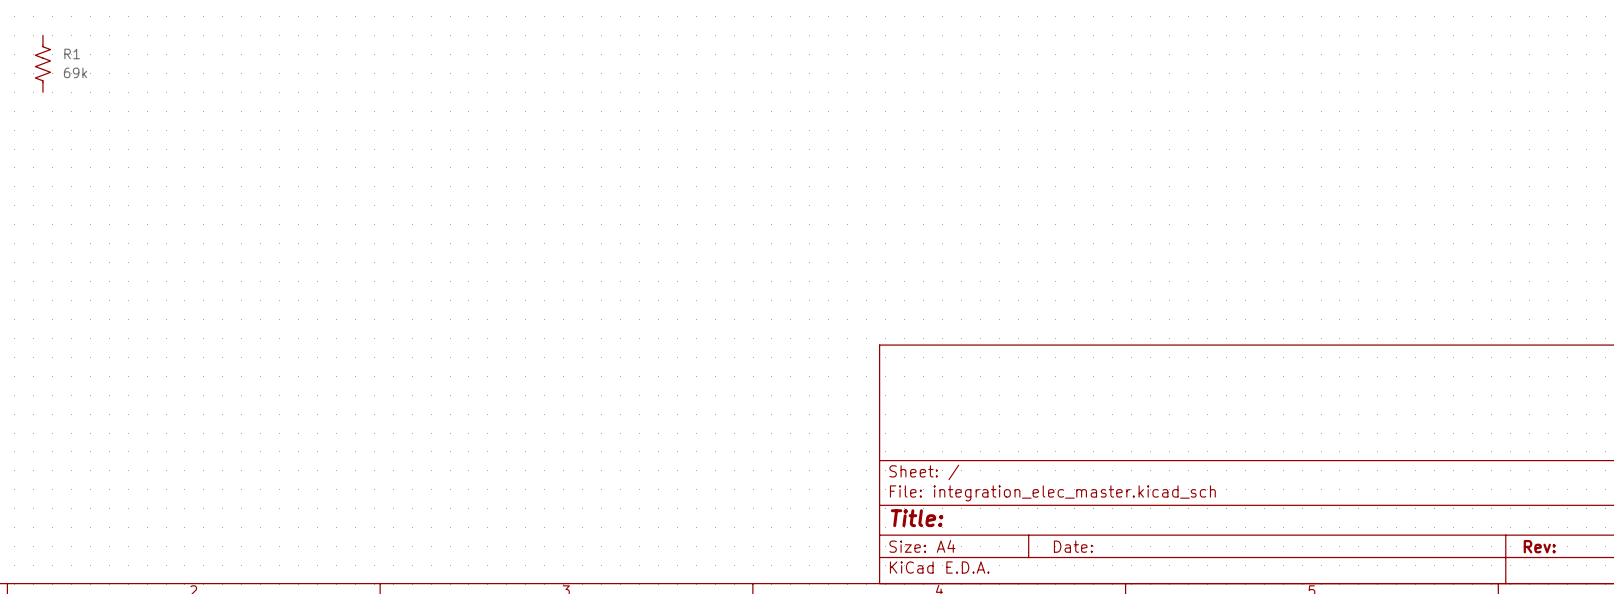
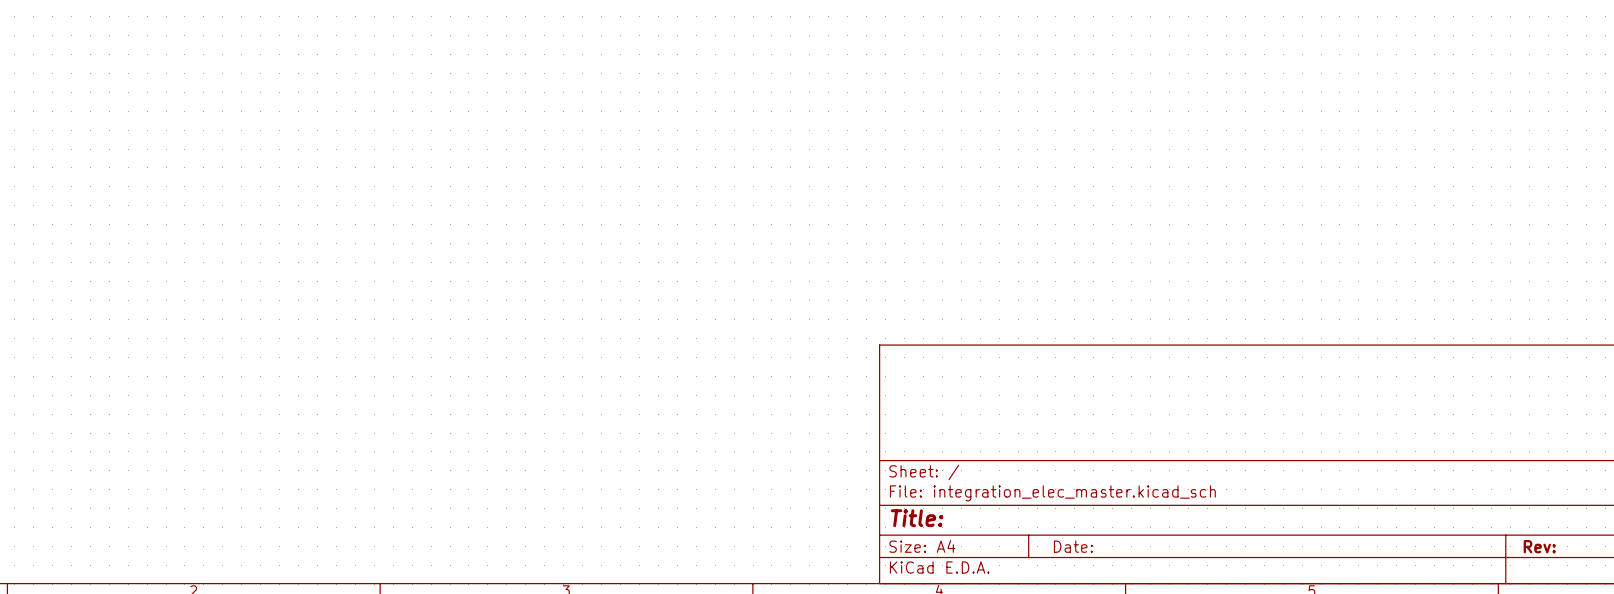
R1: 69k (42, 63) -> none

